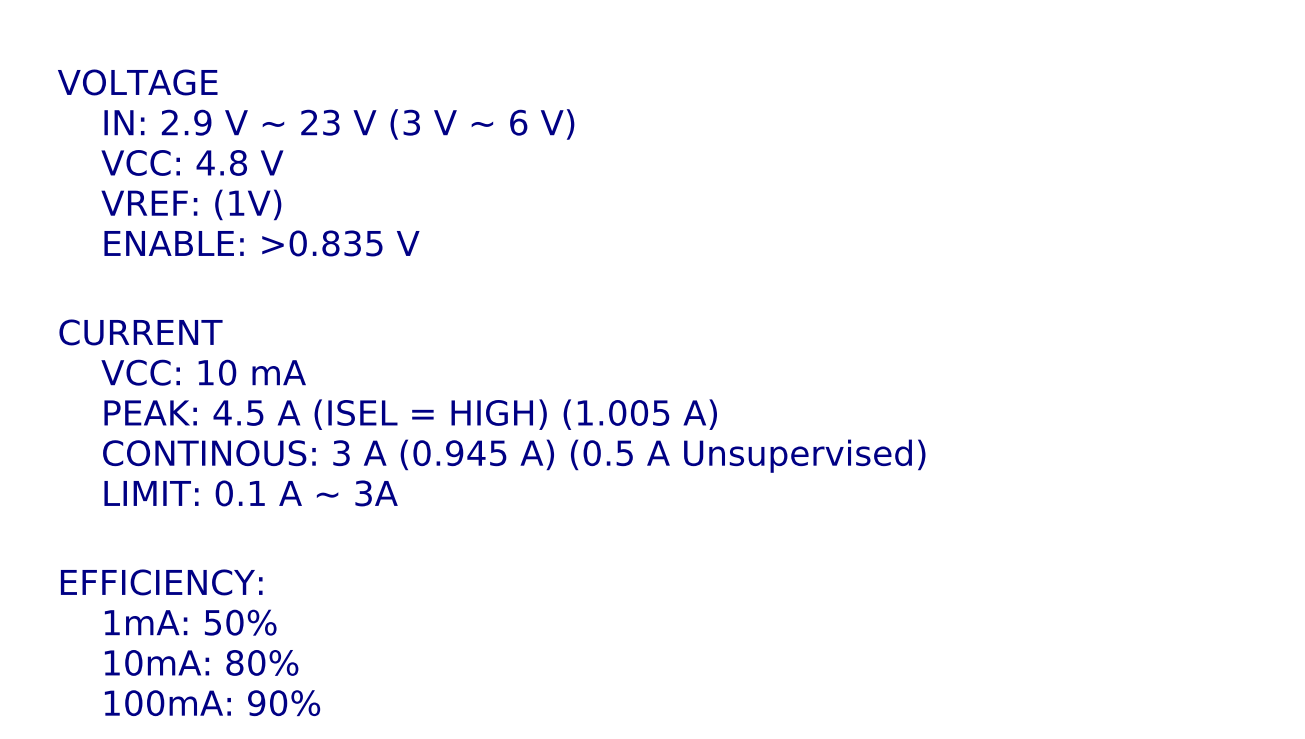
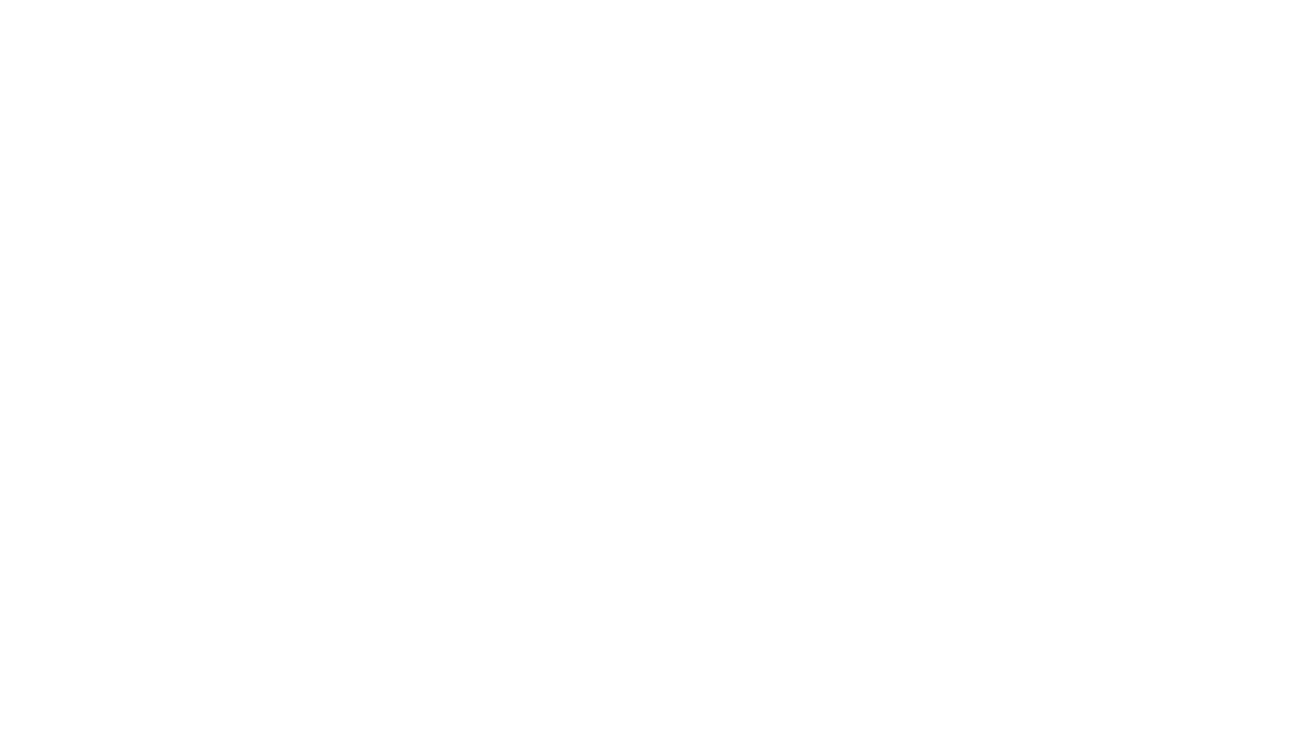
text: VOLTAGE (137, 82) -> none
text: IN: 2.9 V ~ 23 V (3 V ~ 6 V) (339, 124) -> none
text: VCC: 4.8 V (192, 162) -> none
text: VREF: (1V) (191, 204) -> none
text: ENABLE: >0.835 V (262, 243) -> none
text: CURRENT (140, 332) -> none
text: VCC: 10 mA (203, 372) -> none
text: PEAK: 4.5 A (ISEL = HIGH) (1.005 A) (410, 414) -> none
text: CONTINOUS: 3 A (0.945 A) (0.5 A Unsupervised) (514, 456) -> none
text: LIMIT: 0.1 A ~ 3A (251, 493) -> none
text: EFFICIENCY: (161, 582) -> none
text: 1mA: 50% (190, 622) -> none
text: 10mA: 80% (201, 662) -> none
text: 100mA: 90% (212, 703) -> none

